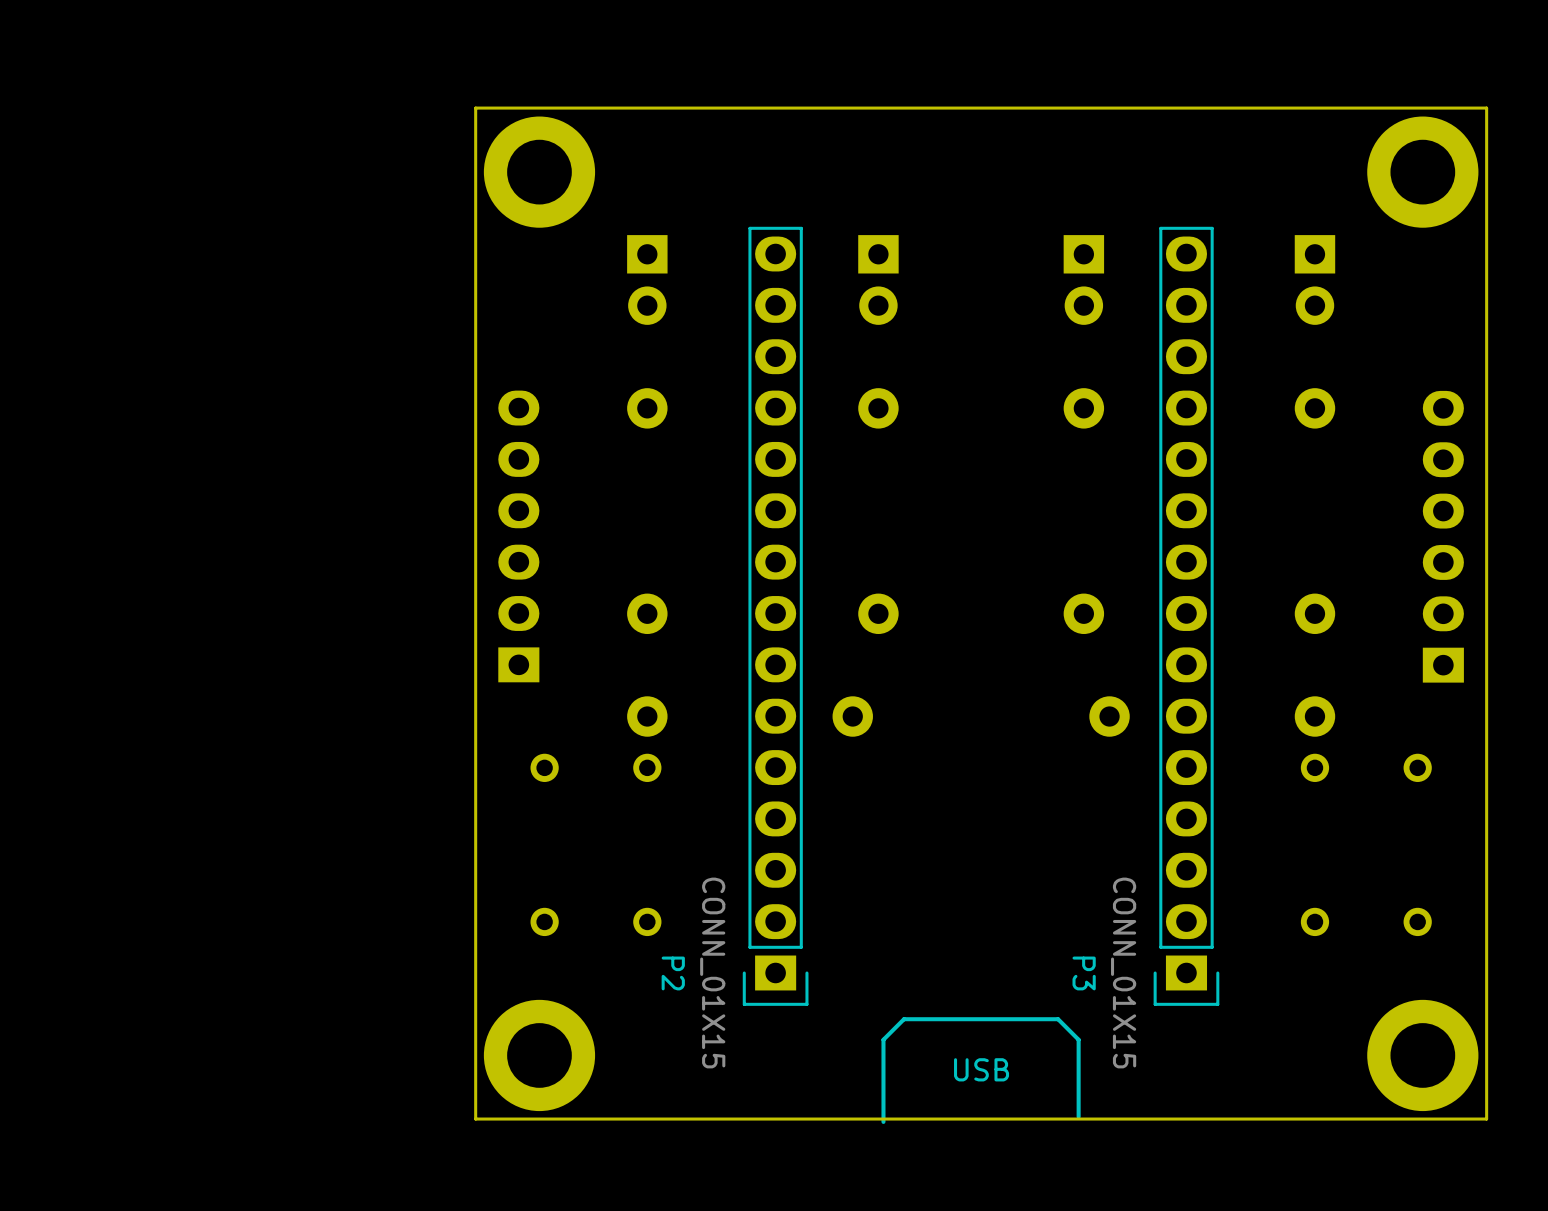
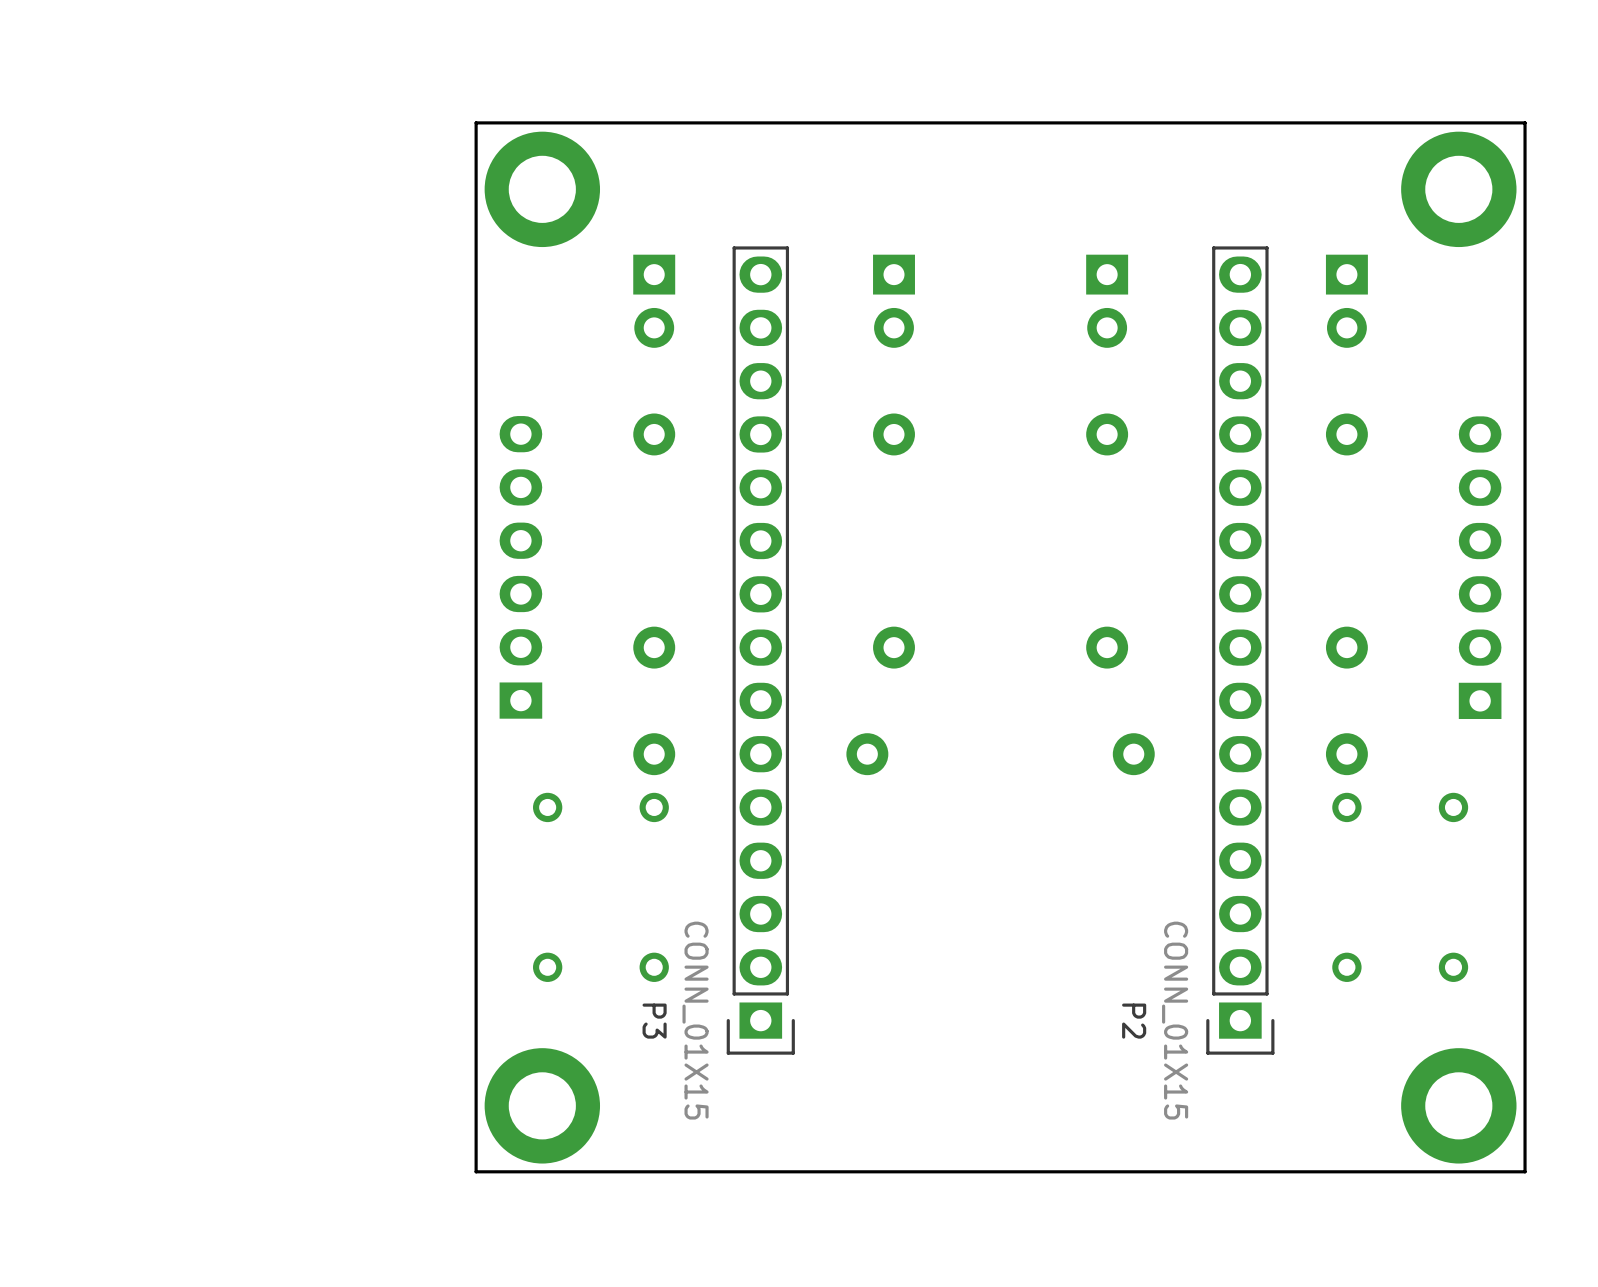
P2 position: (775, 616) -> (1240, 650)
P3 position: (1186, 616) -> (760, 650)
text: USB (981, 1069) -> none
line: (1078, 1116) (1078, 1039) (1058, 1019) (904, 1019) (883, 1039) (883, 1121) -> none

